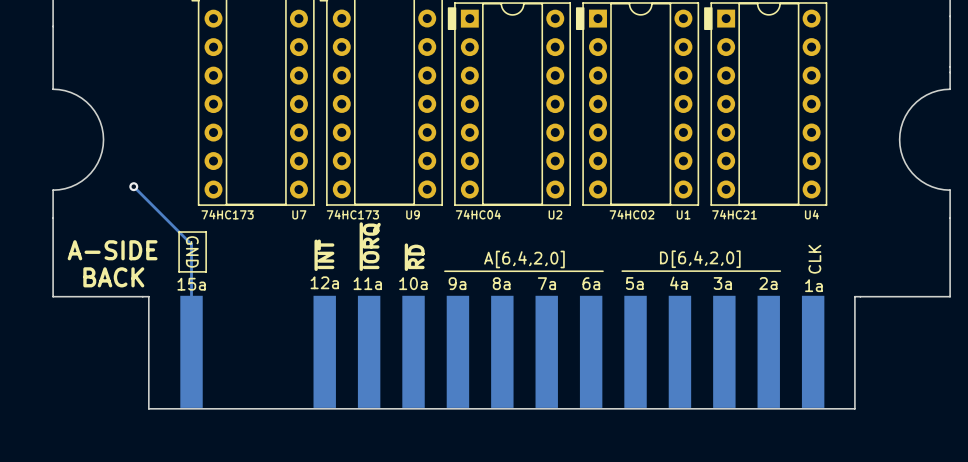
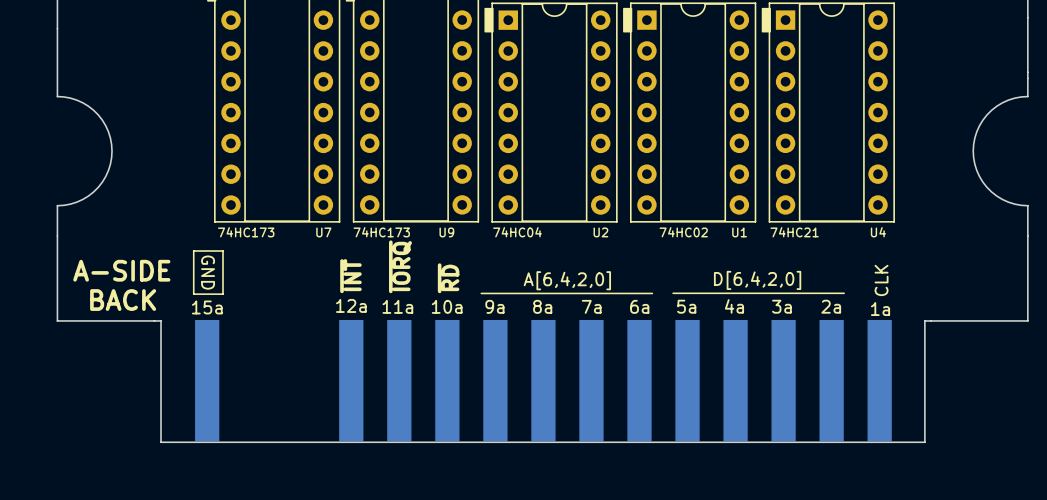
track: (133, 186) (191, 244) (191, 351) -> none
via: (133, 186) -> none

